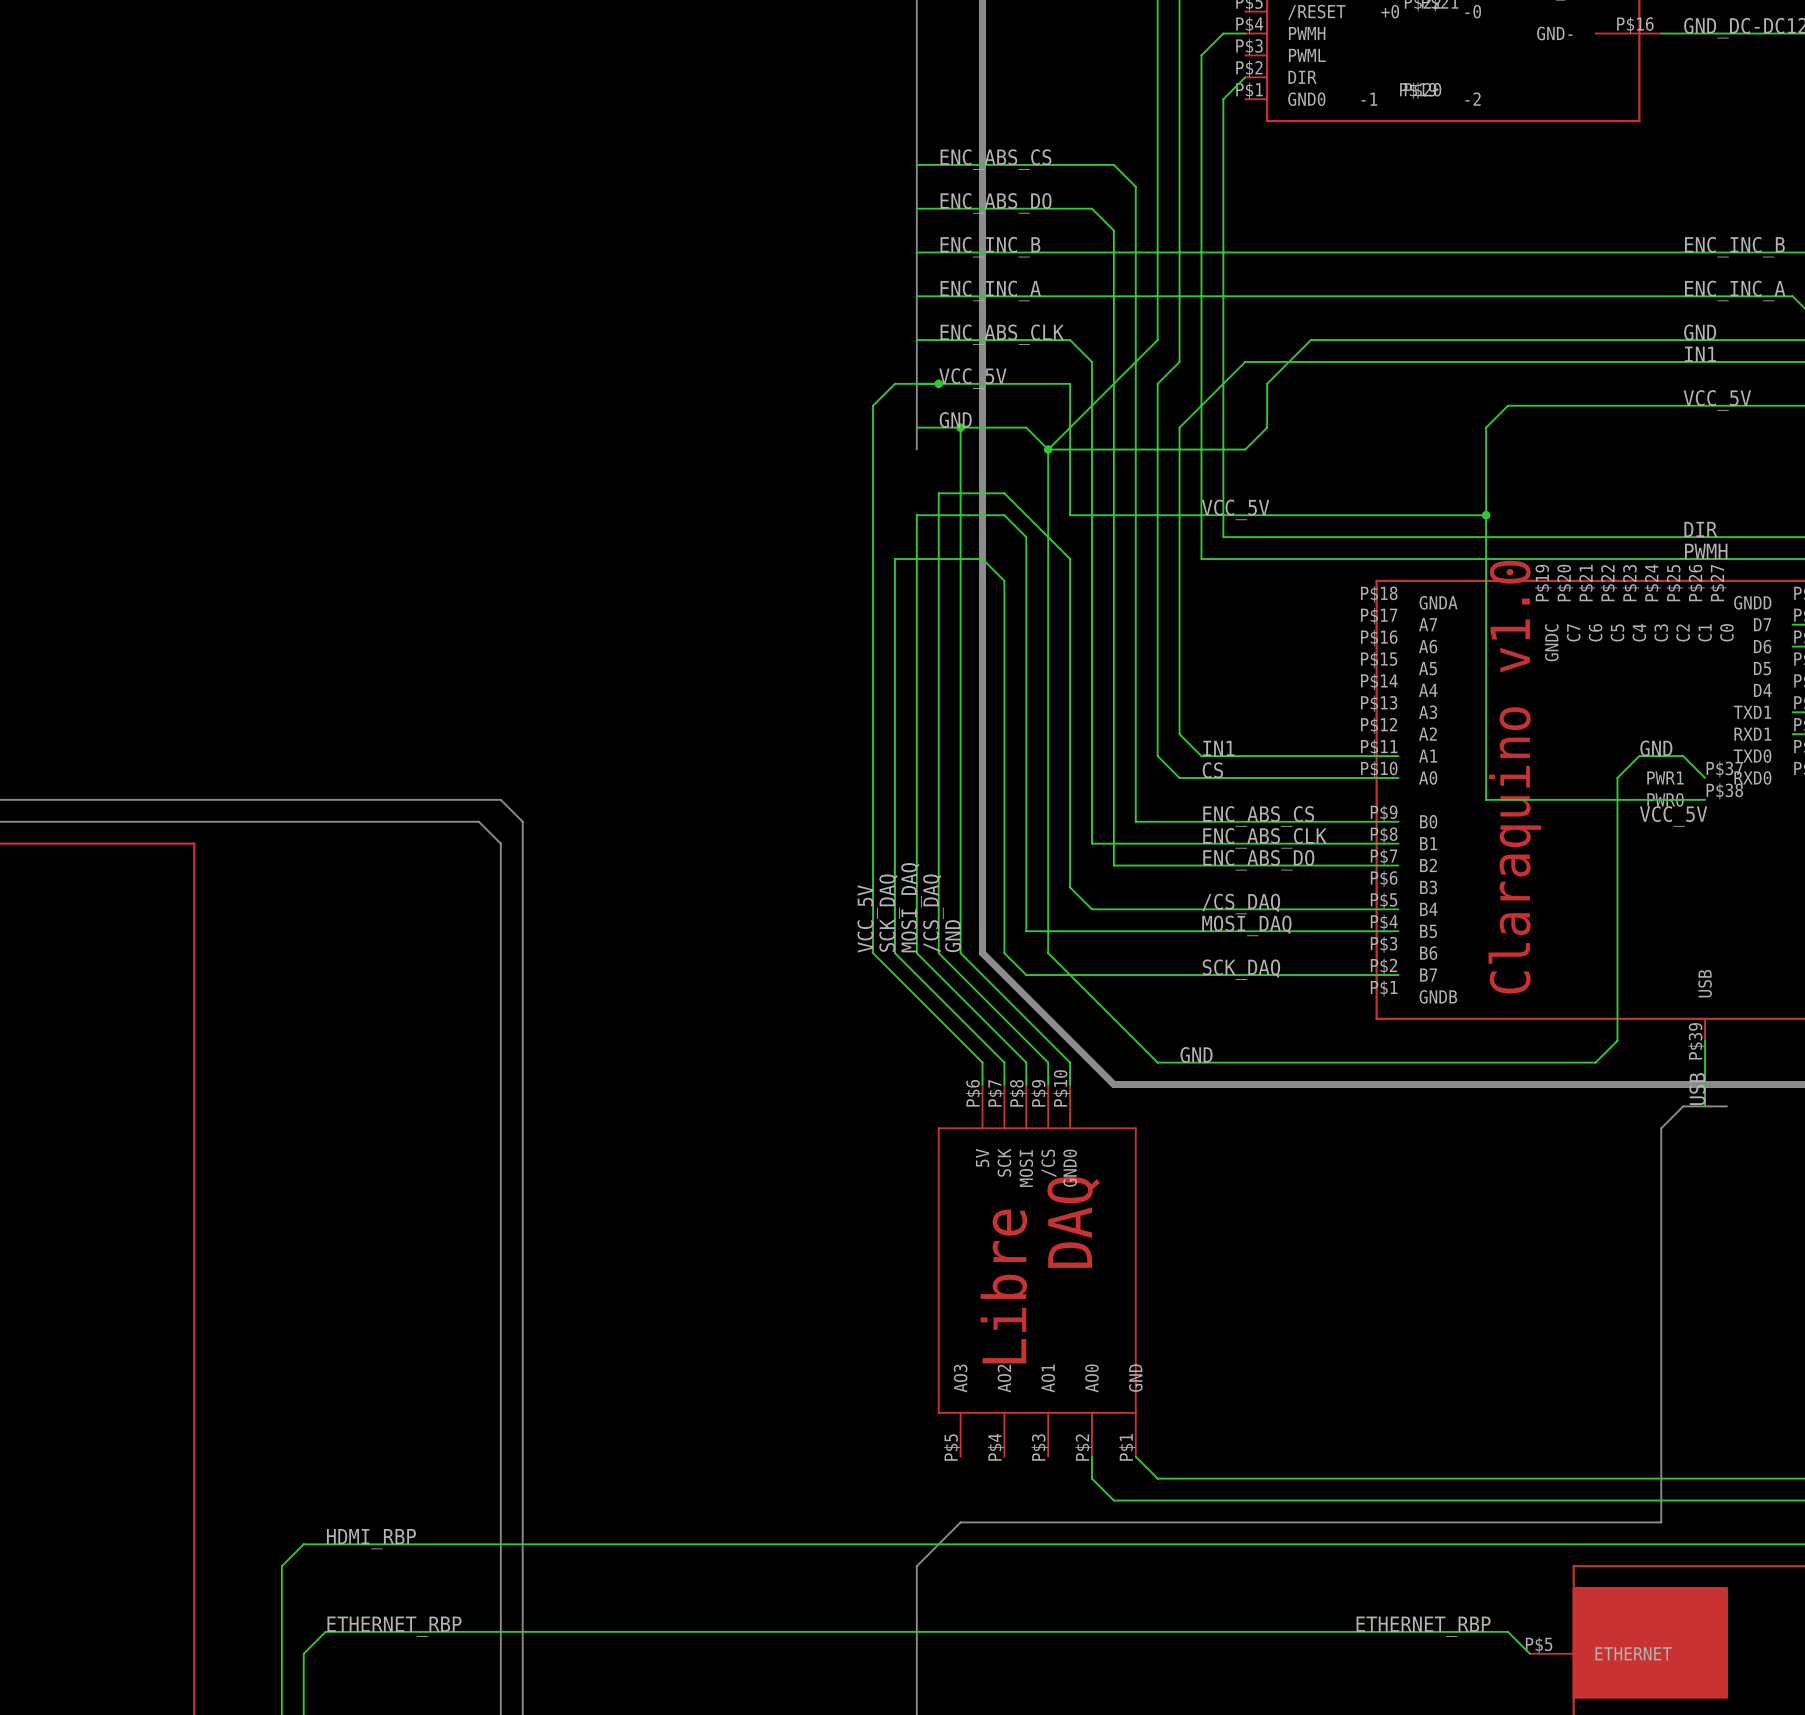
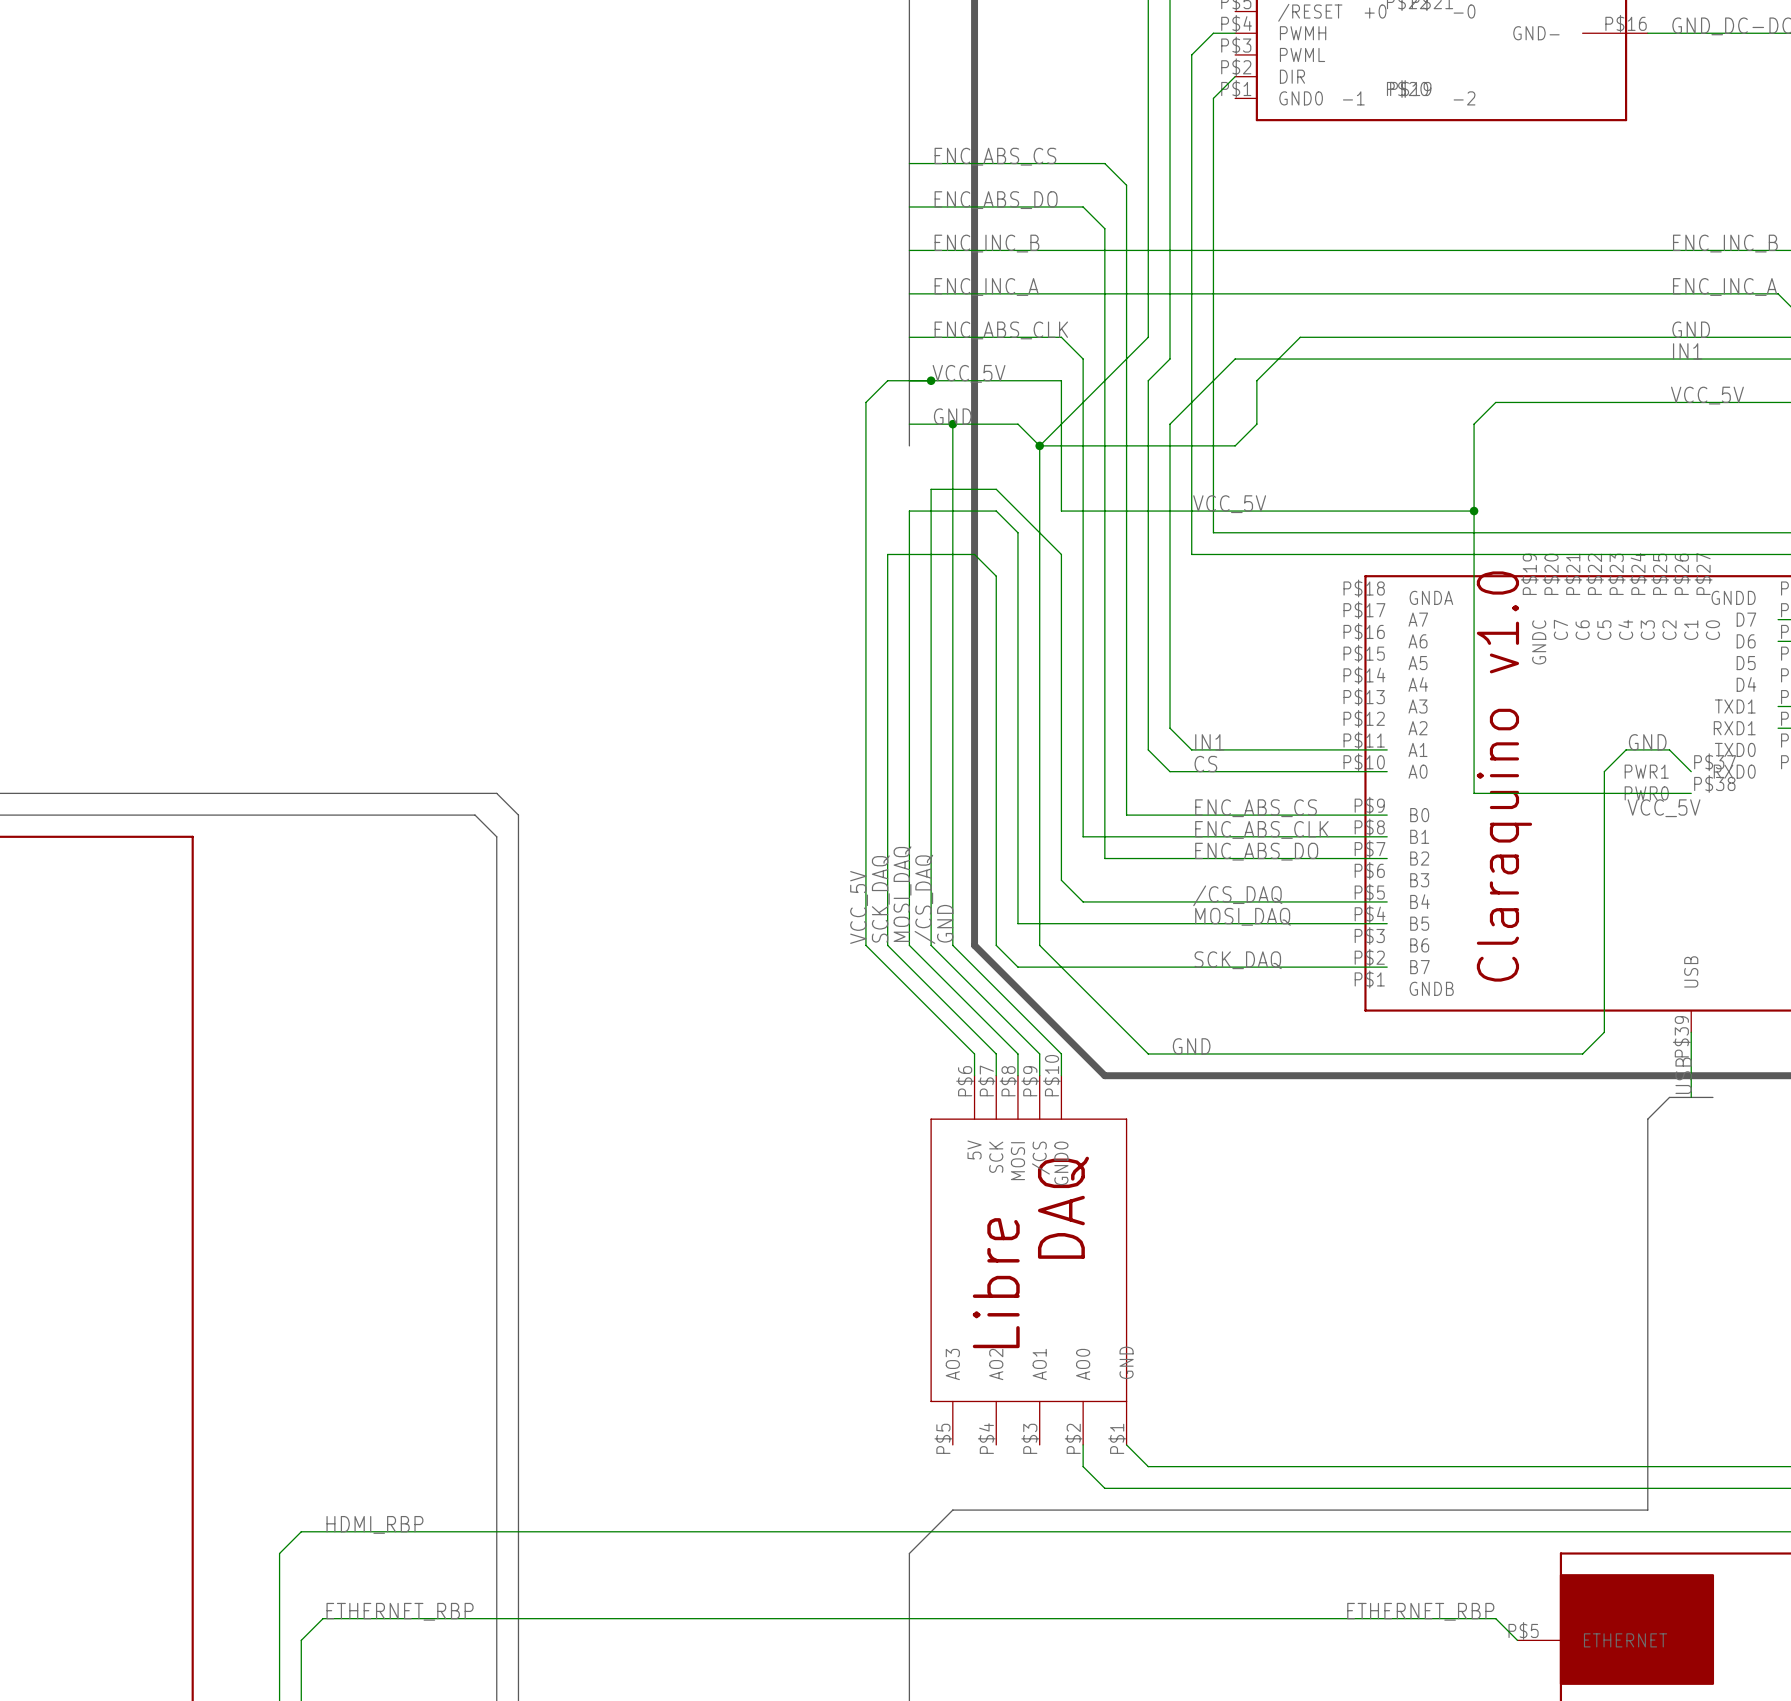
label: DIR (1700, 529) -> none
label: PWMH (1706, 551) -> none

